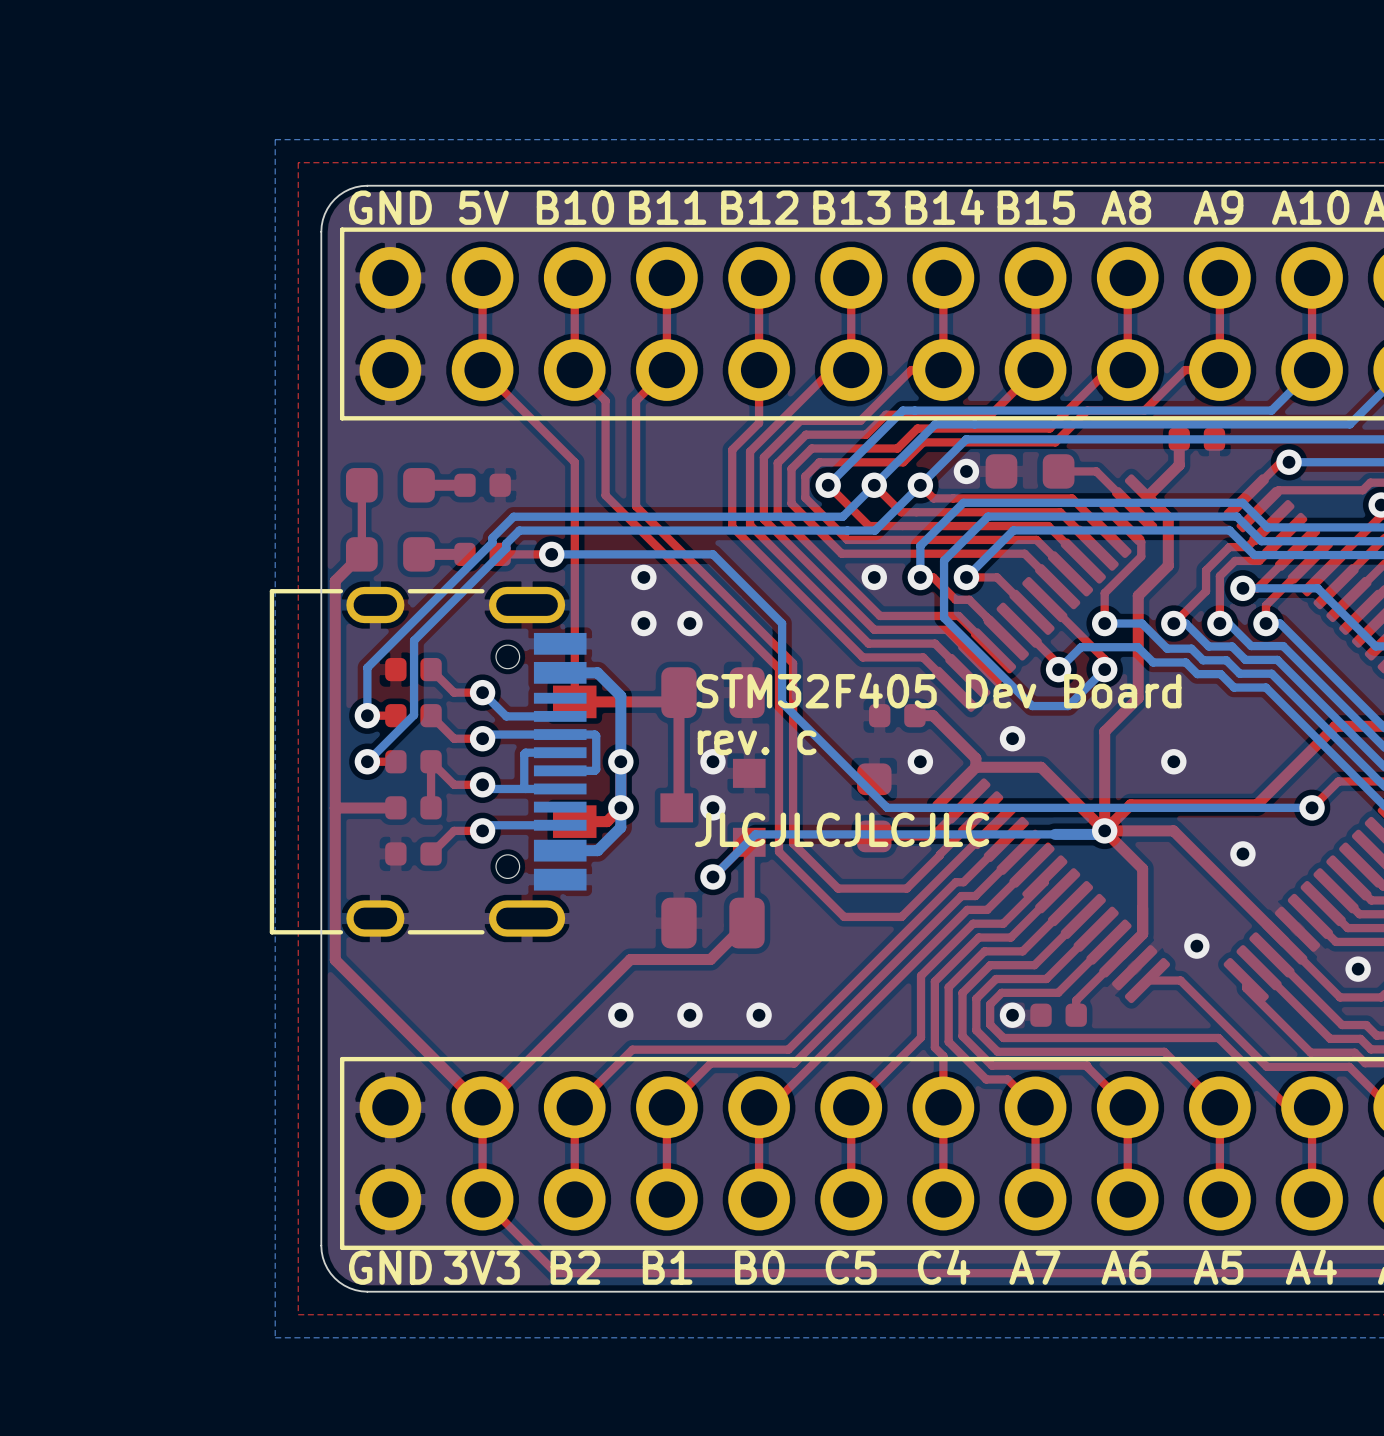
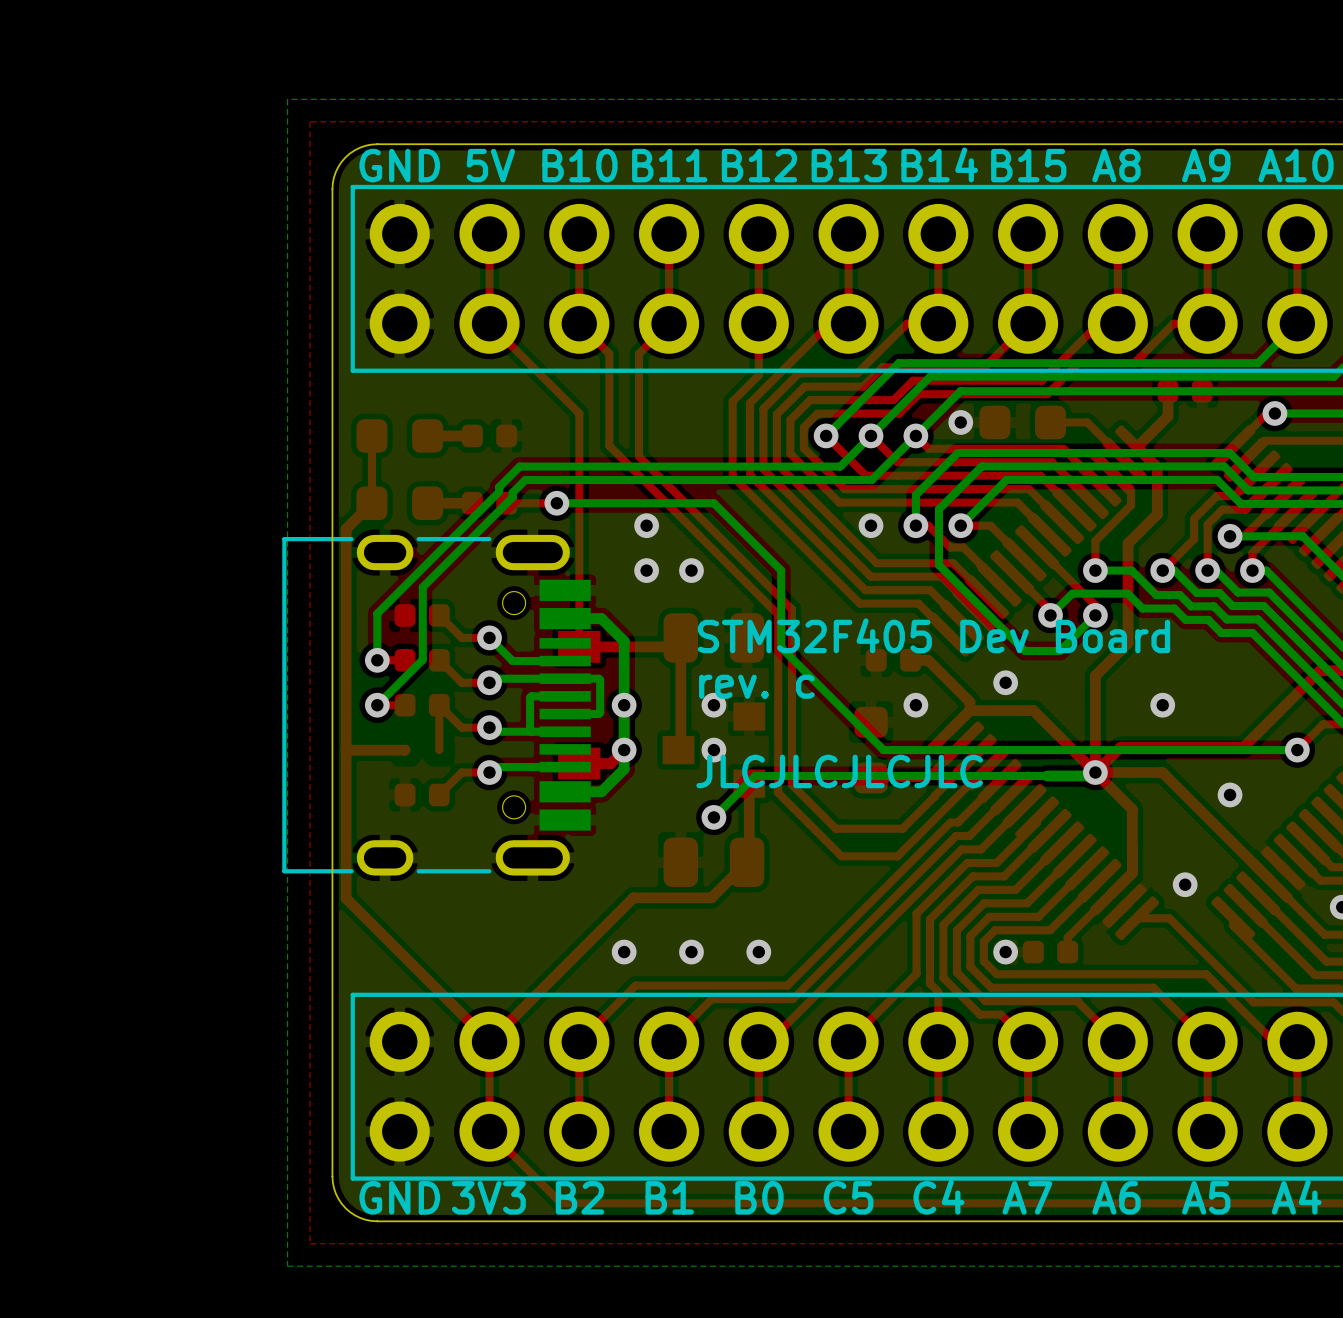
part: (413, 807) -> none

